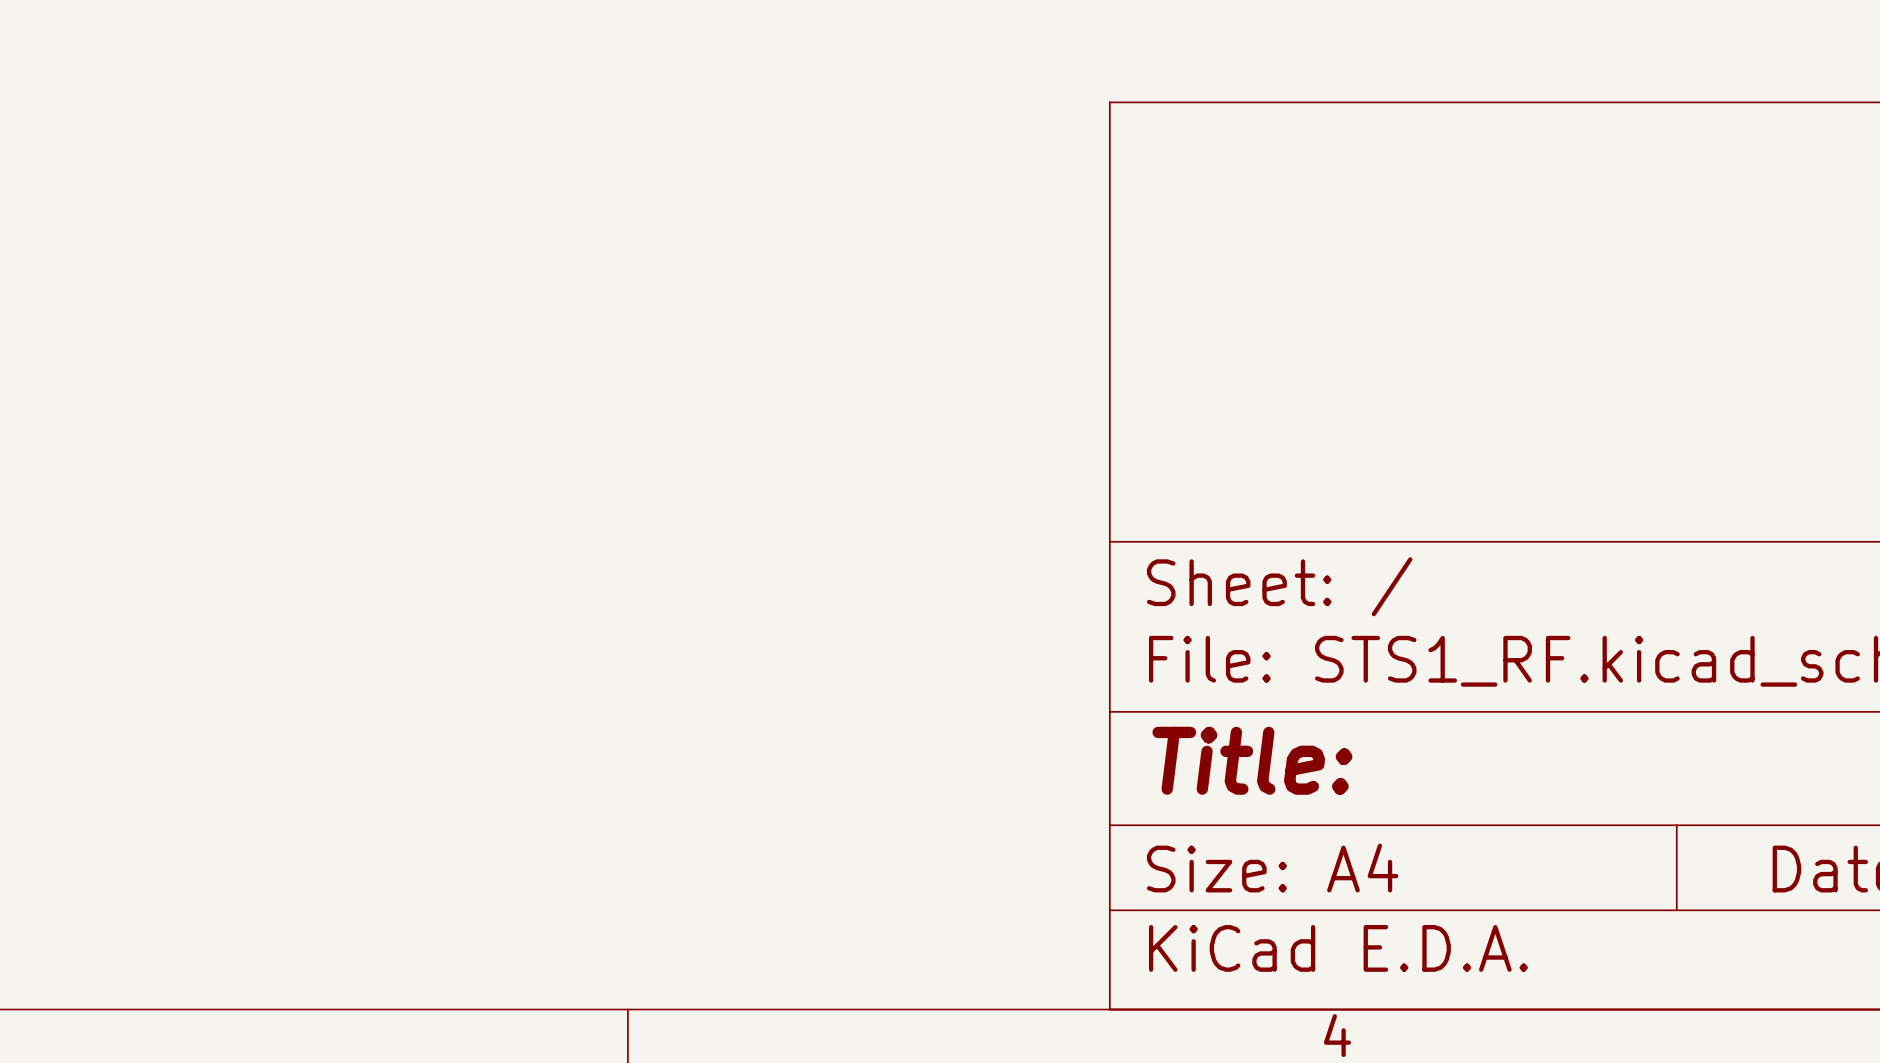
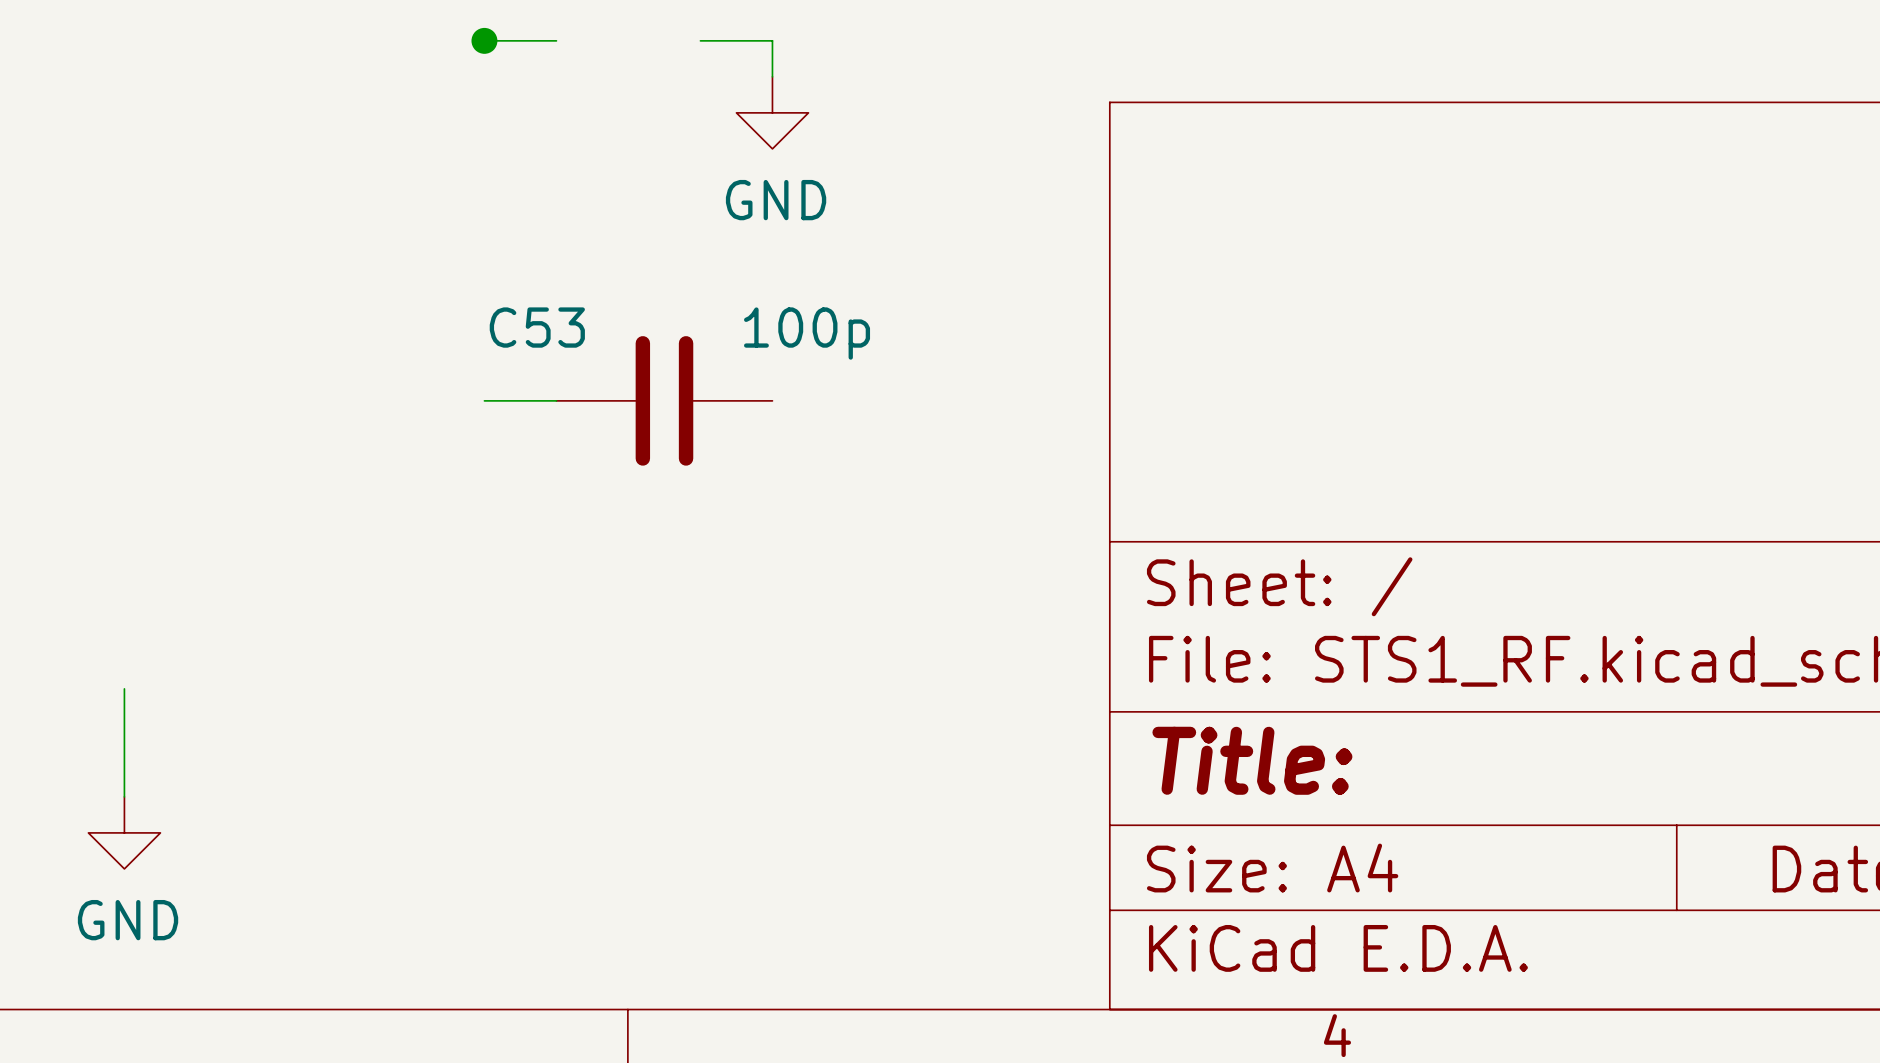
wire: none -> (484, 40) (556, 40)
junction: none -> (484, 40)
wire: none -> (700, 40) (772, 40) (772, 76)
power symbol: none -> GND (772, 112)
wire: none -> (484, 400) (556, 400)
C53: none -> 100p (664, 400)
wire: none -> (124, 688) (124, 796)
power symbol: none -> GND (124, 832)

